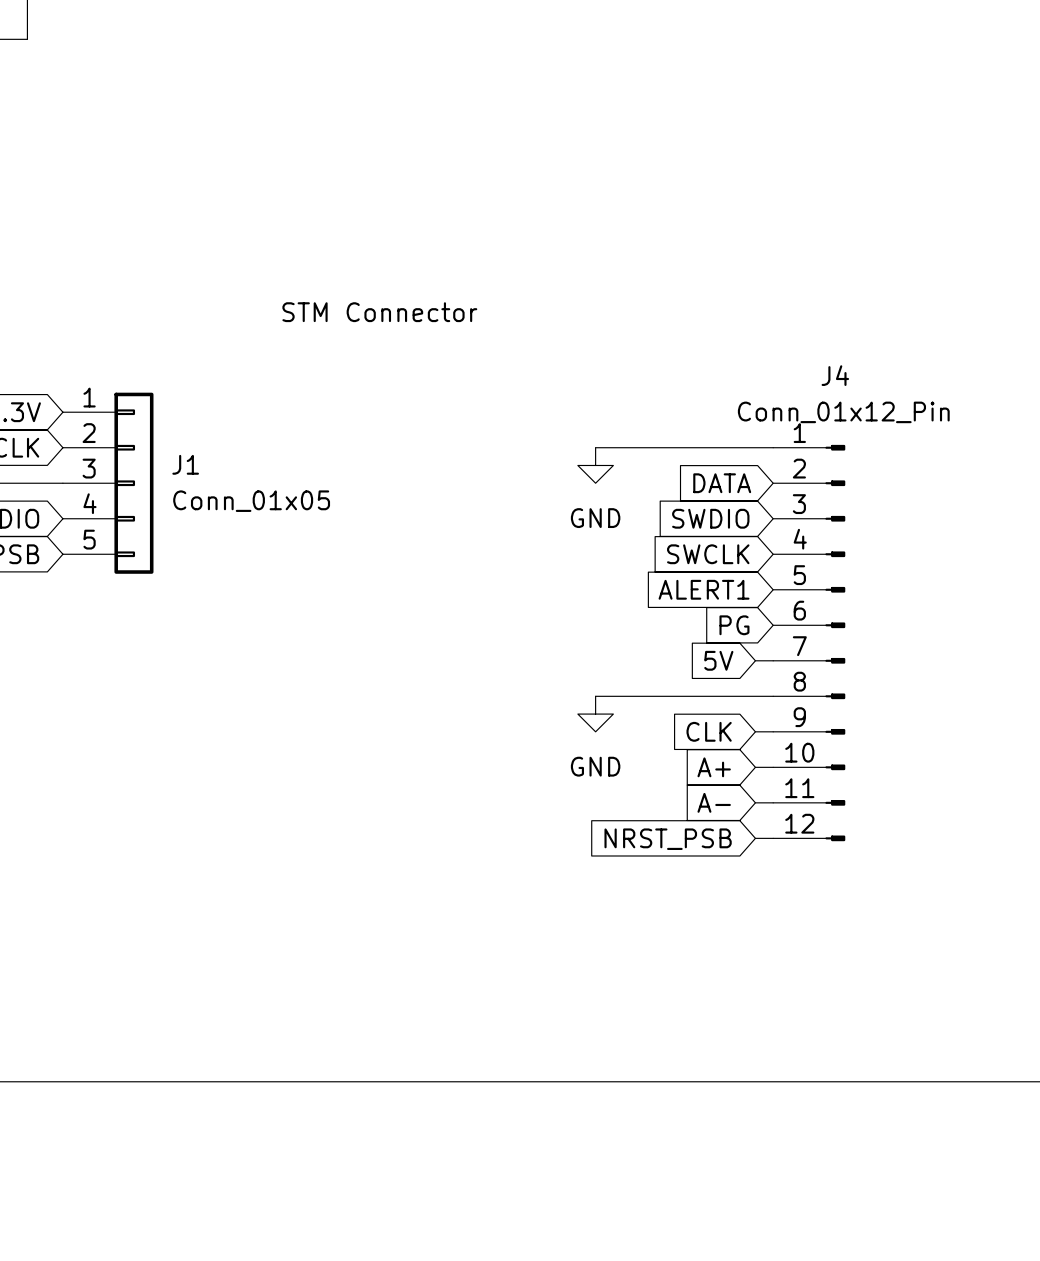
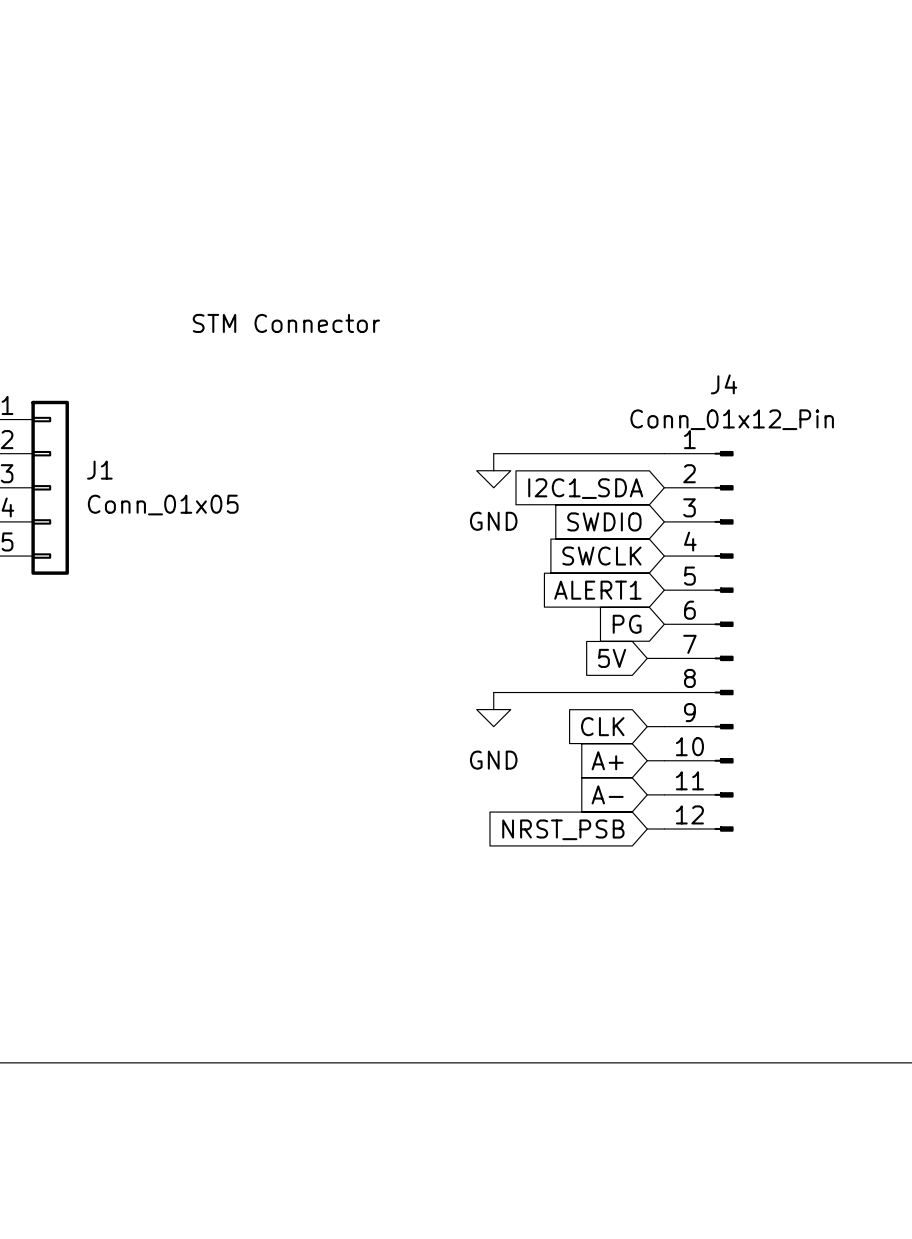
global label: DATA (722, 483) -> I2C1_SDA (585, 488)

